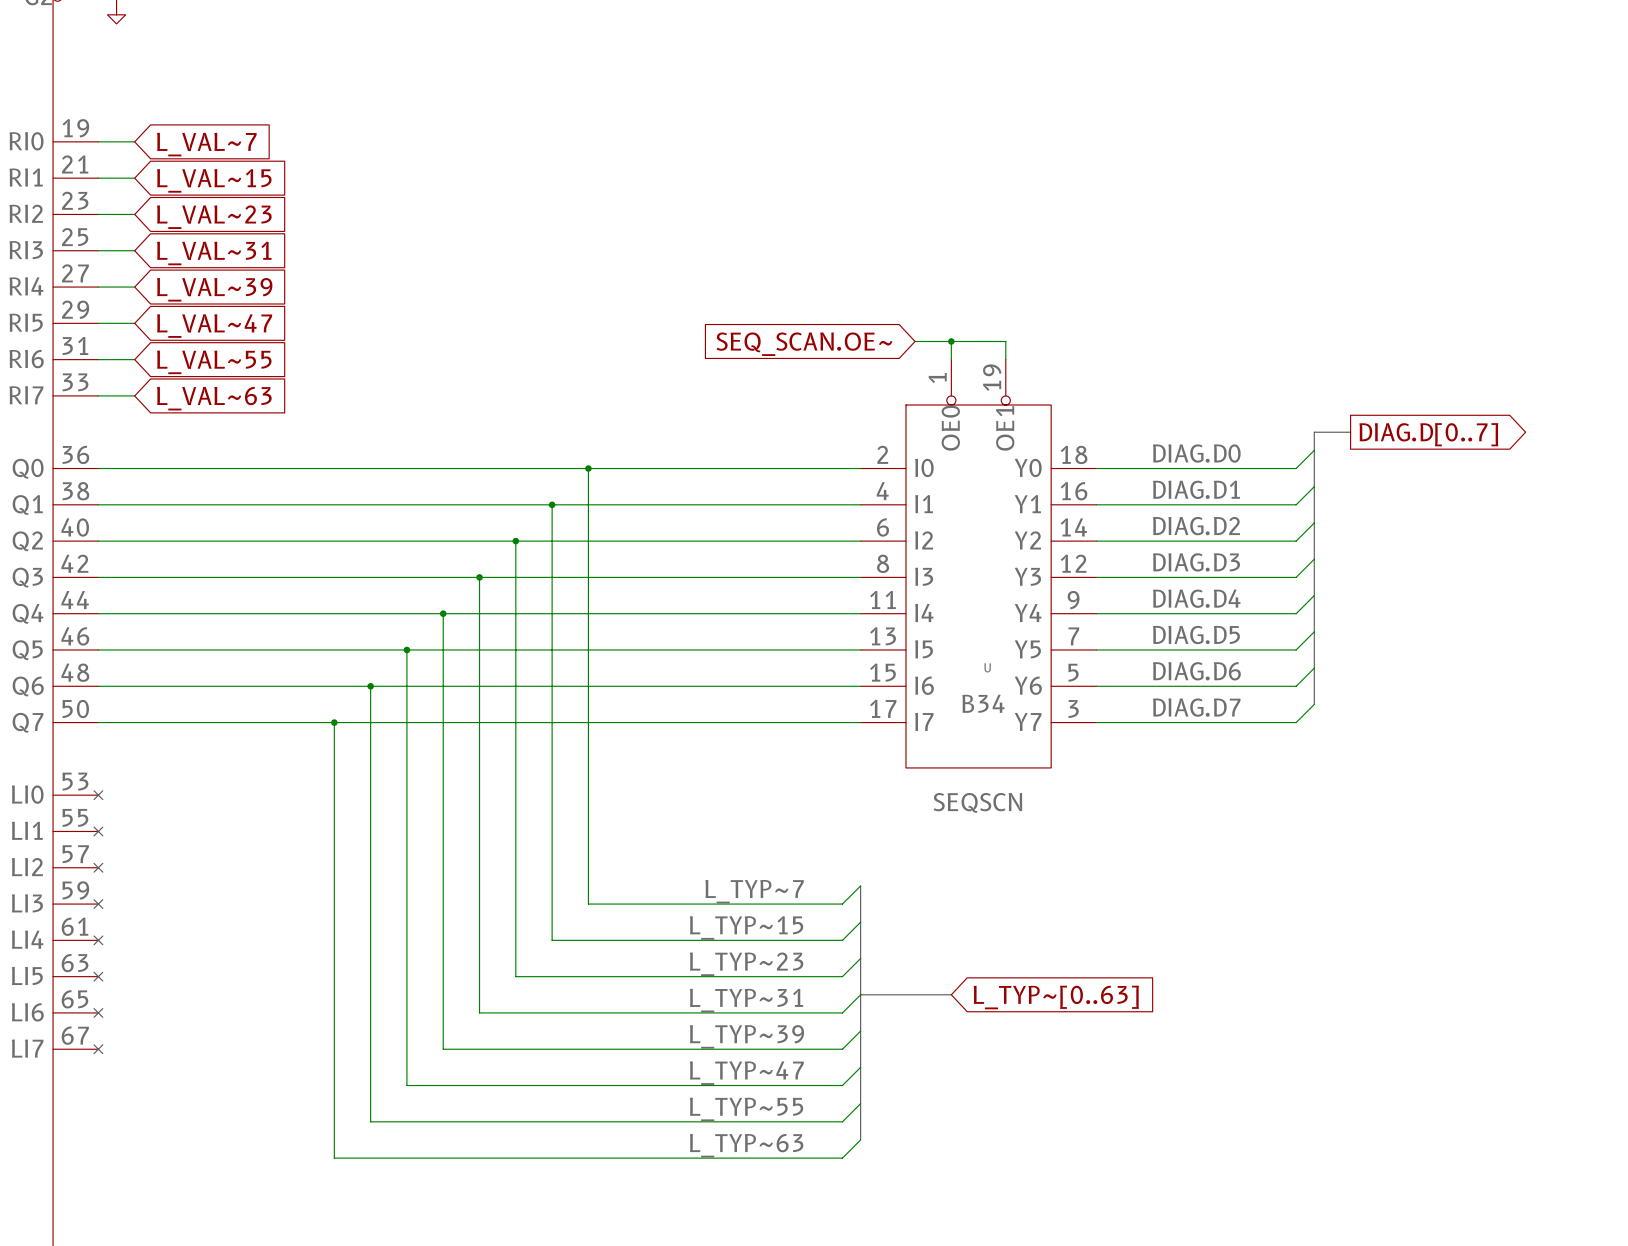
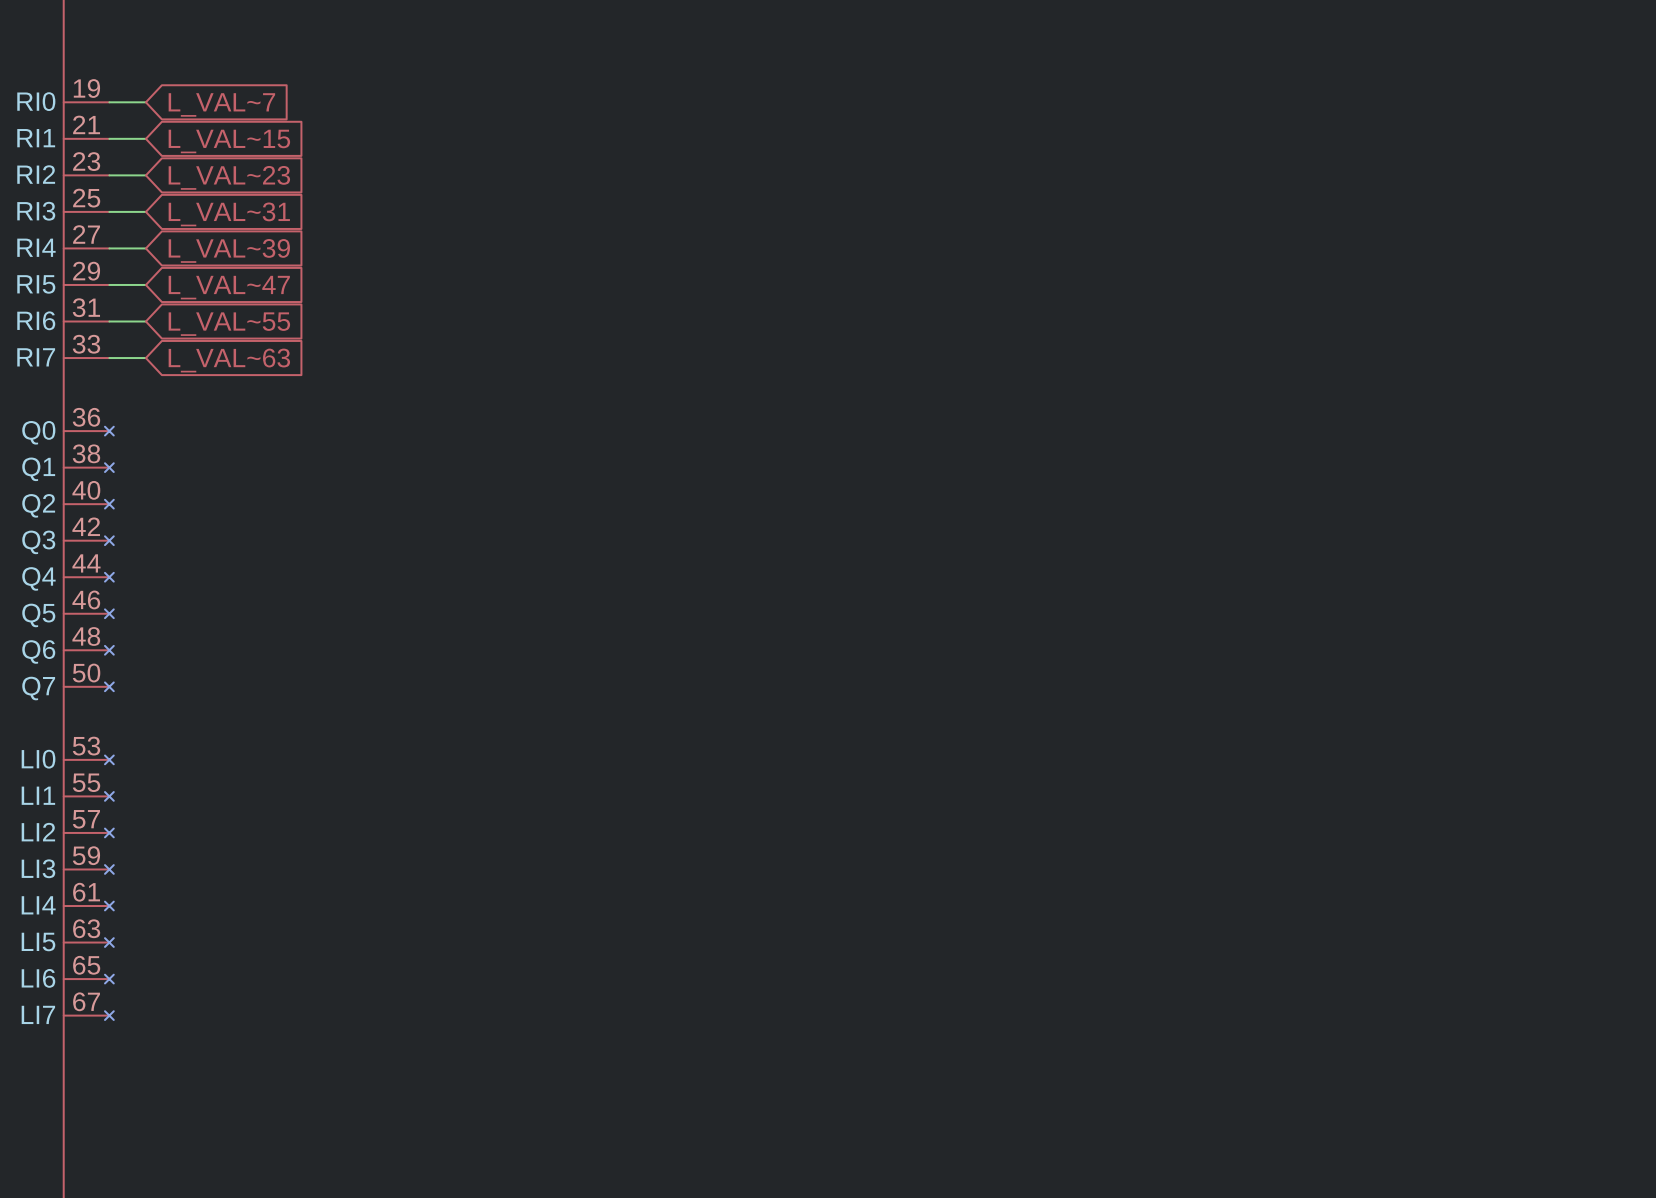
wire: (915, 341) (1005, 341) (1005, 359) -> none
wire: (951, 341) (951, 359) -> none
junction: (951, 341) -> none
global label: SEQ_SCAN.OE~ (804, 344) -> none
bus: (1350, 432) (1314, 432) (1314, 704) -> none
global label: DIAG.D[0..7] (1428, 434) -> none
wire: (1314, 450) (1296, 468) (1096, 468) -> none
label: DIAG.D0 (1196, 453) -> none
wire: (98, 468) (860, 468) -> none
no-connect mark: none -> (109, 431)
wire: (588, 468) (588, 904) (842, 904) (860, 885) -> none
junction: (588, 468) -> none
wire: (1314, 486) (1296, 504) (1096, 504) -> none
label: DIAG.D1 (1196, 489) -> none
wire: (98, 504) (860, 504) -> none
no-connect mark: none -> (109, 467)
wire: (552, 504) (552, 940) (842, 940) (860, 922) -> none
junction: (552, 504) -> none
wire: (1314, 522) (1296, 541) (1096, 541) -> none
label: DIAG.D2 (1196, 526) -> none
wire: (98, 541) (860, 541) -> none
no-connect mark: none -> (109, 504)
wire: (515, 541) (515, 976) (842, 976) (860, 958) -> none
junction: (515, 541) -> none
wire: (1314, 559) (1296, 577) (1096, 577) -> none
label: DIAG.D3 (1196, 562) -> none
U: (978, 563) -> none
wire: (98, 577) (860, 577) -> none
no-connect mark: none -> (109, 540)
wire: (479, 577) (479, 1012) (842, 1012) (860, 994) -> none
junction: (479, 577) -> none
wire: (1314, 595) (1296, 613) (1096, 613) -> none
label: DIAG.D4 (1196, 598) -> none
wire: (98, 613) (860, 613) -> none
no-connect mark: none -> (109, 577)
wire: (443, 613) (443, 1049) (842, 1049) (860, 1031) -> none
junction: (443, 613) -> none
wire: (1314, 631) (1296, 649) (1096, 649) -> none
label: DIAG.D5 (1196, 634) -> none
wire: (98, 649) (860, 649) -> none
no-connect mark: none -> (109, 613)
wire: (406, 649) (406, 1085) (842, 1085) (860, 1067) -> none
junction: (406, 649) -> none
wire: (1314, 668) (1296, 686) (1096, 686) -> none
label: DIAG.D6 (1196, 671) -> none
wire: (98, 686) (860, 686) -> none
no-connect mark: none -> (109, 650)
wire: (370, 686) (370, 1121) (842, 1121) (860, 1103) -> none
junction: (370, 686) -> none
wire: (1314, 704) (1296, 722) (1096, 722) -> none
label: DIAG.D7 (1196, 707) -> none
wire: (98, 722) (860, 722) -> none
no-connect mark: none -> (109, 686)
wire: (334, 722) (334, 1158) (842, 1158) (860, 1139) -> none
junction: (334, 722) -> none
bus: (860, 885) (860, 1139) -> none
label: L_TYP~7 (754, 891) -> none
label: L_TYP~15 (746, 927) -> none
label: L_TYP~23 (746, 964) -> none
bus: (860, 994) (951, 994) -> none
global label: L_TYP~[0..63] (1056, 997) -> none
label: L_TYP~31 (746, 1000) -> none
label: L_TYP~39 (746, 1036) -> none
label: L_TYP~47 (746, 1073) -> none
label: L_TYP~55 (746, 1109) -> none
label: L_TYP~63 (746, 1145) -> none

